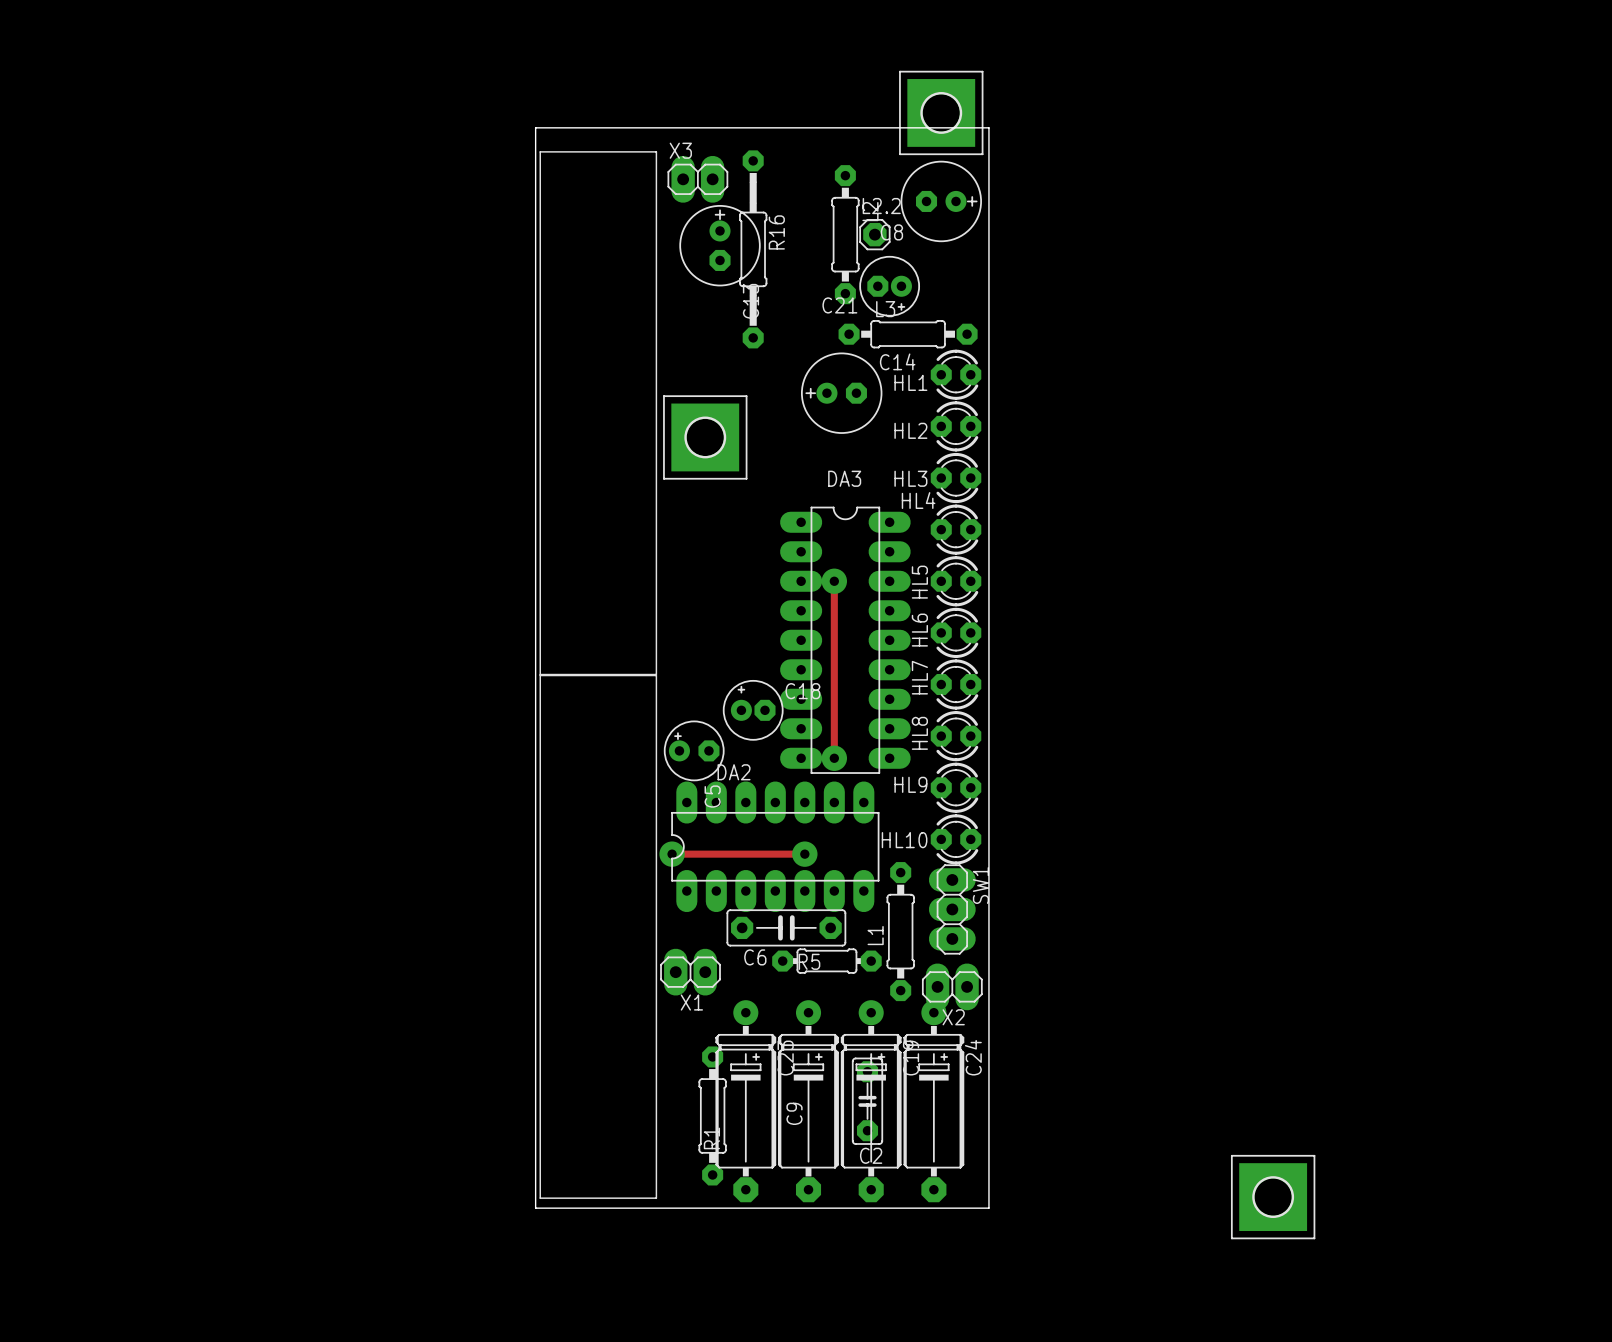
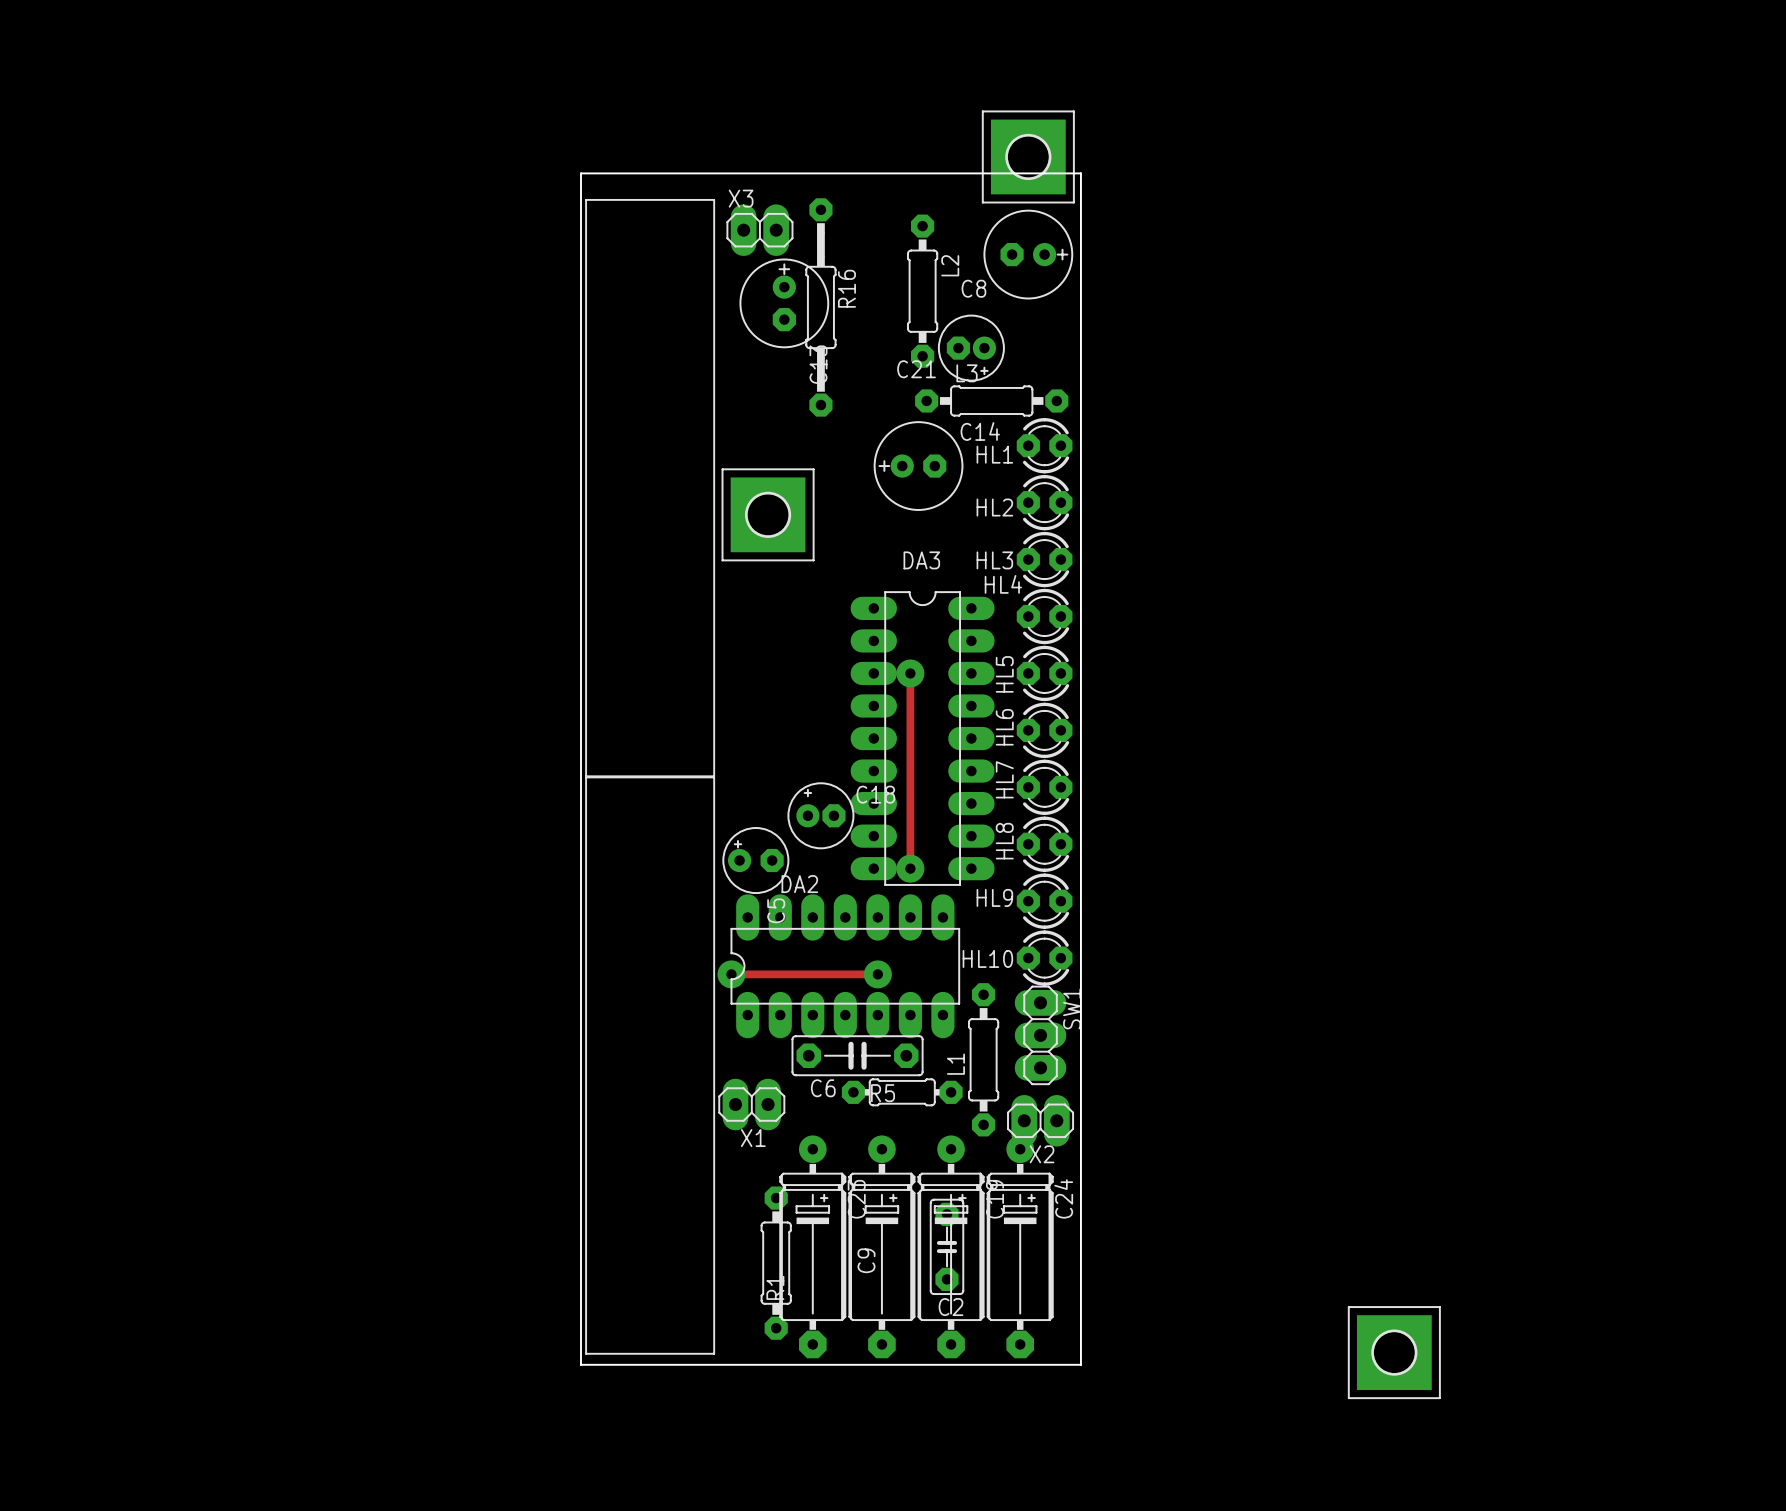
L2.2: (874, 234) -> none

